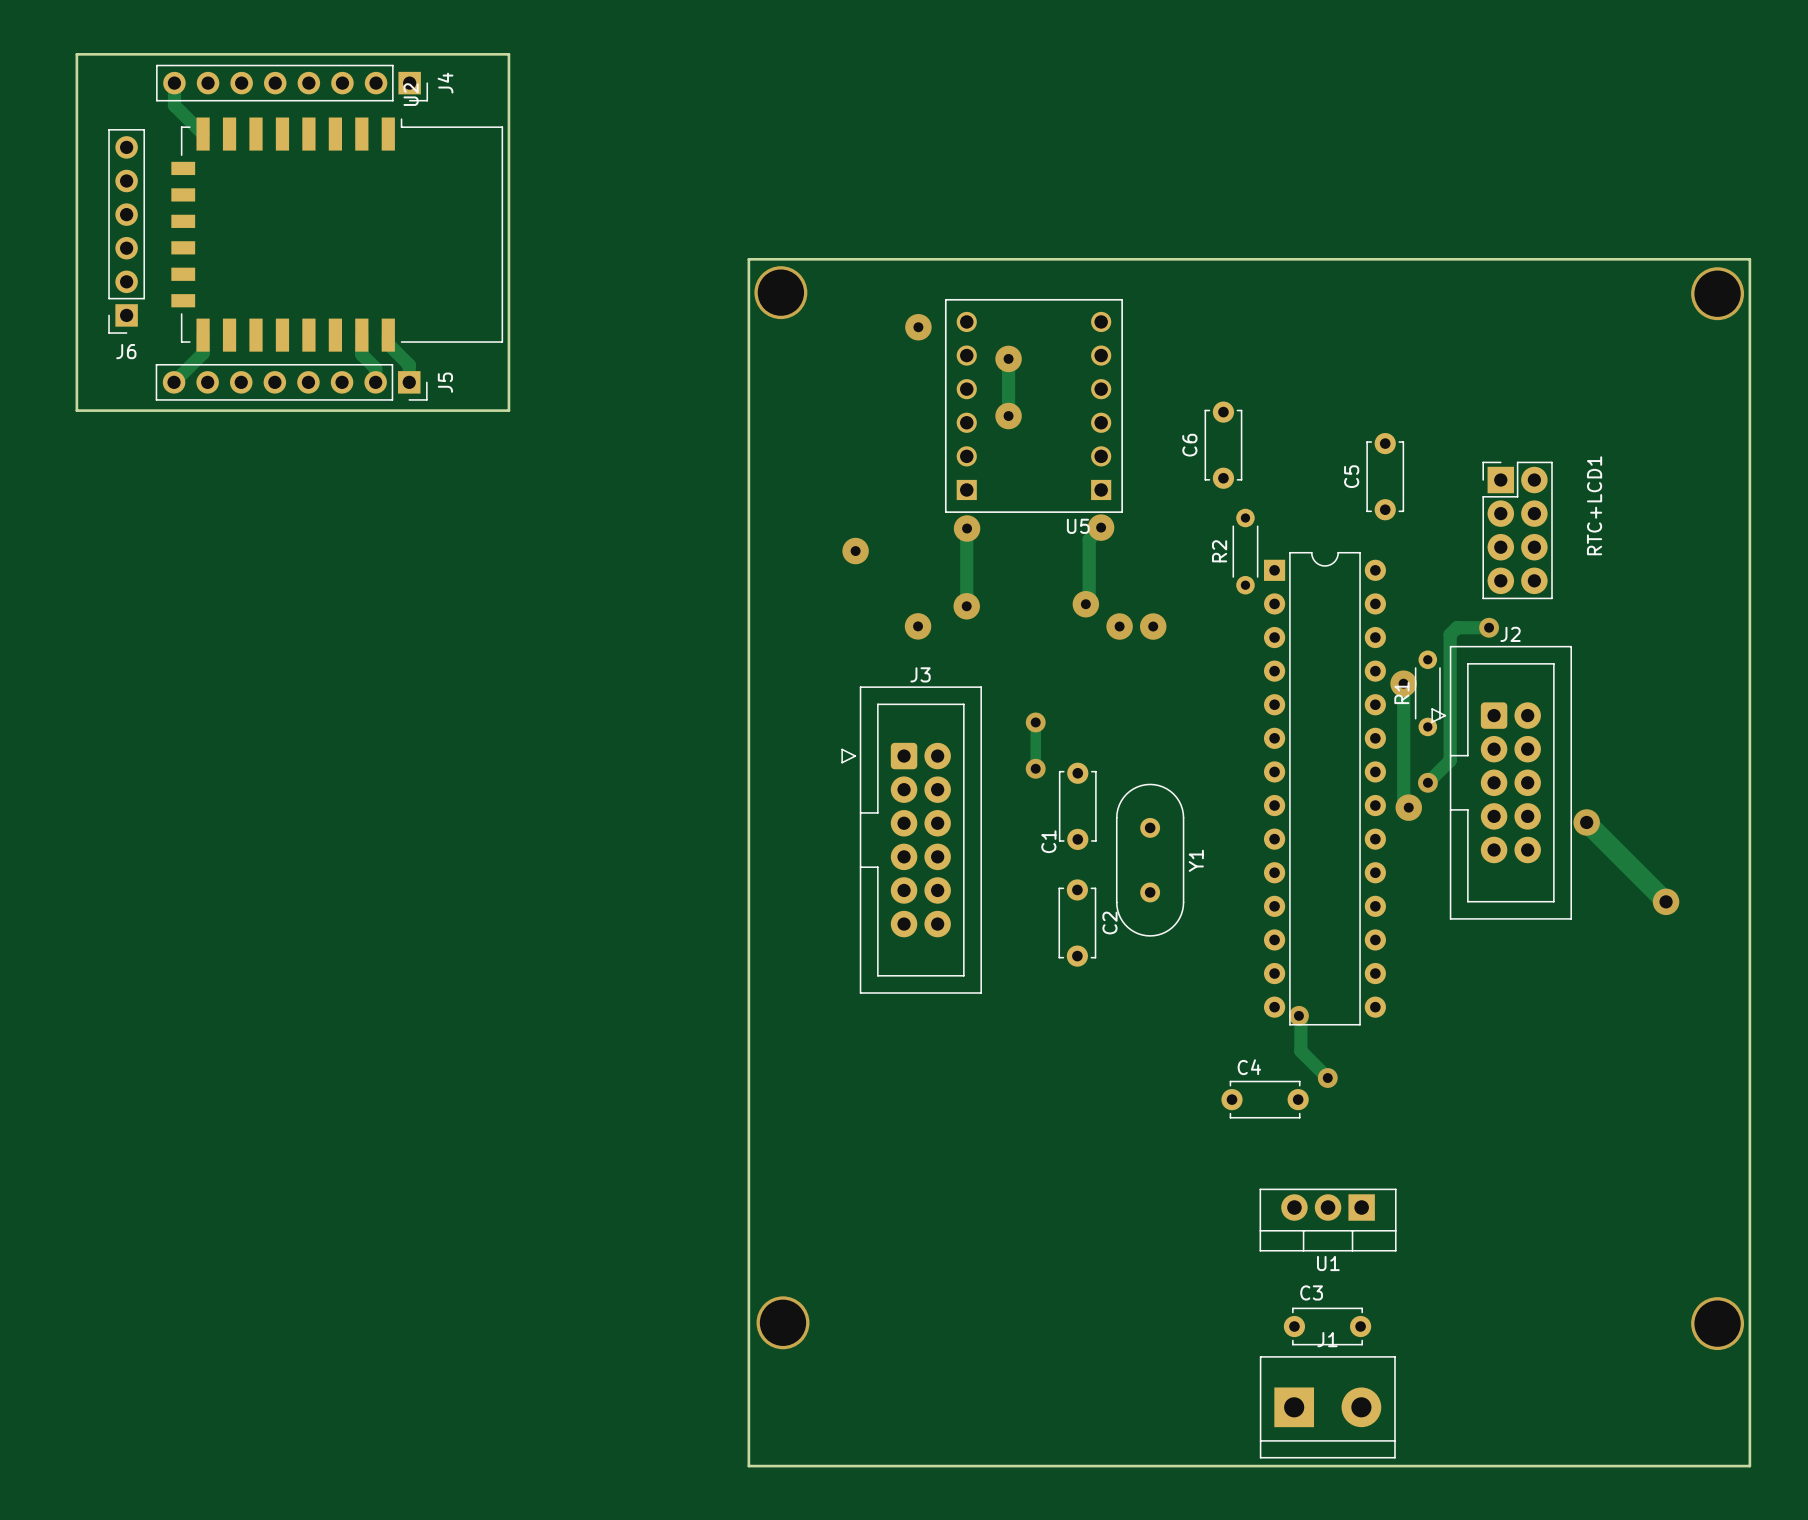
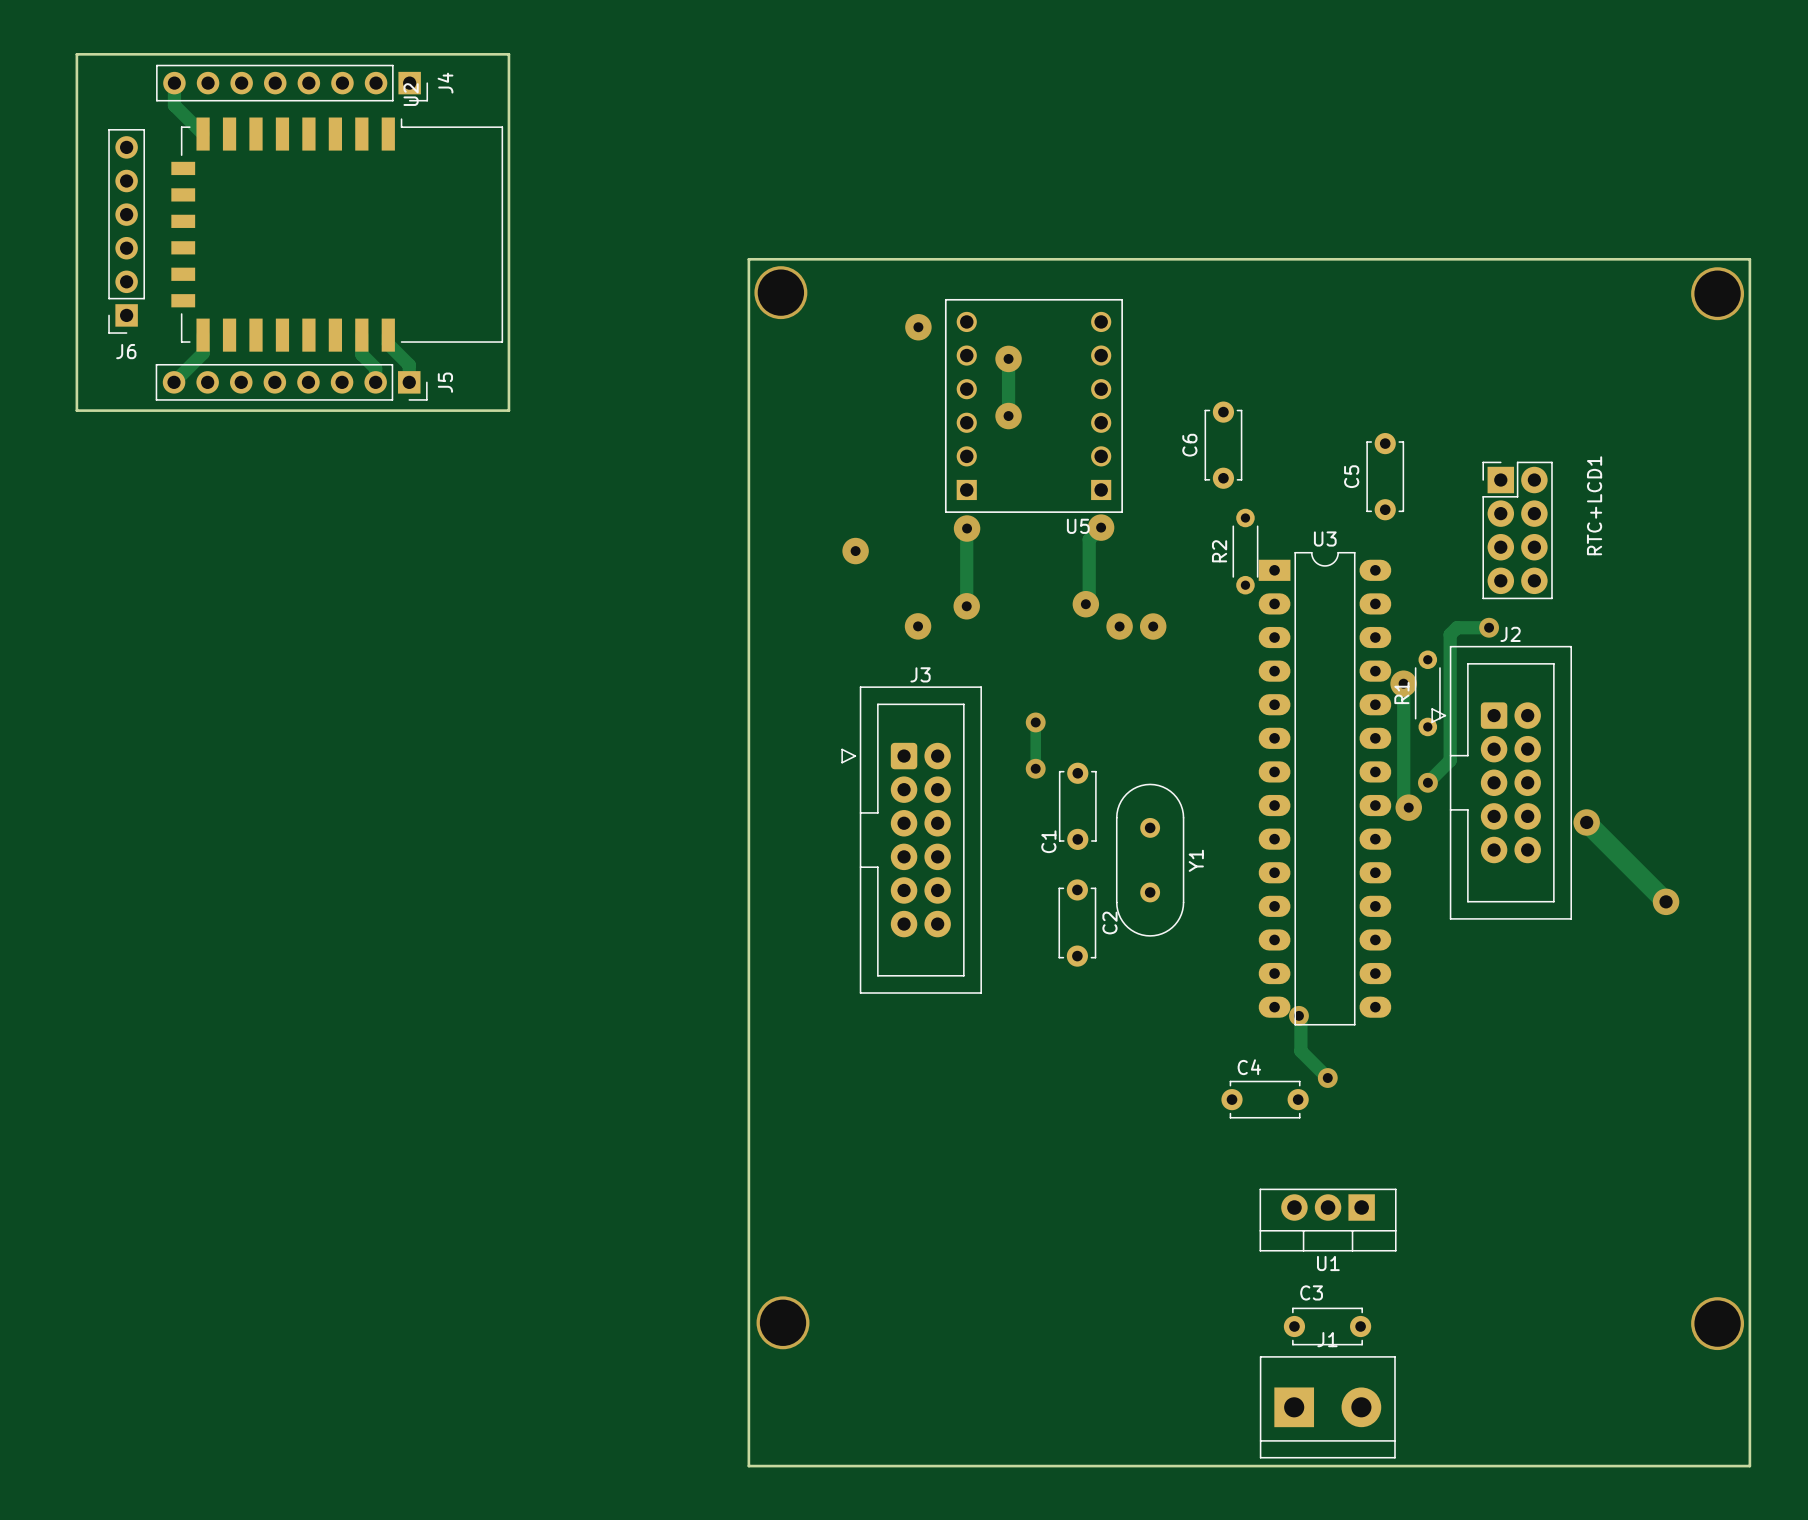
part: (1324, 788) -> none
U3: none -> (1324, 788)

